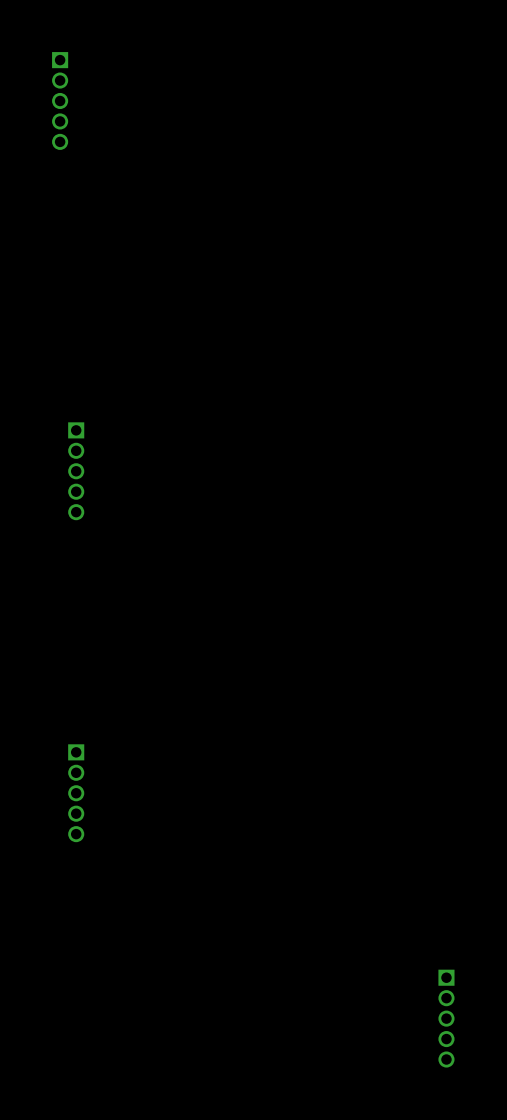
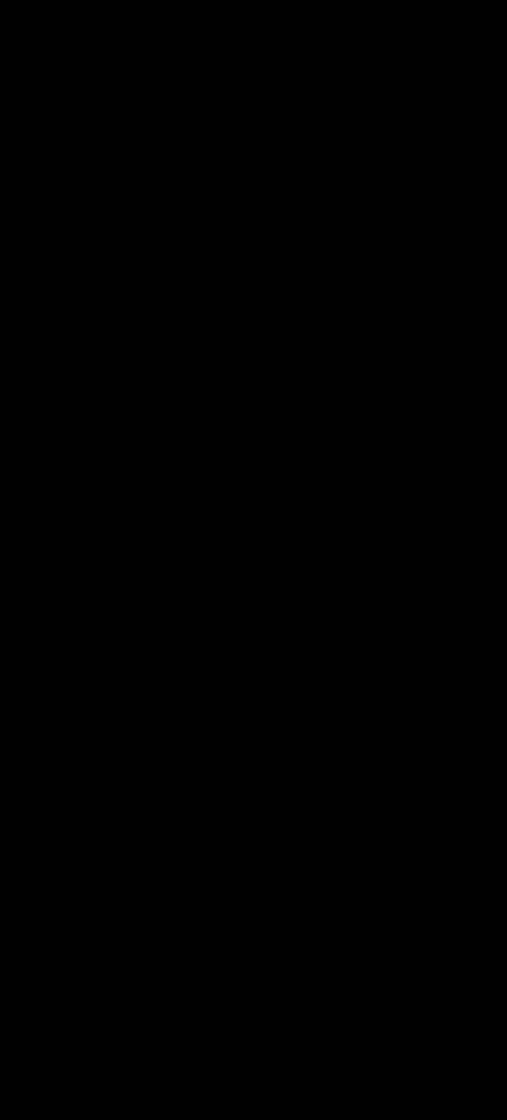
part: (60, 100) -> none
part: (76, 471) -> none
part: (76, 793) -> none
part: (446, 1018) -> none

